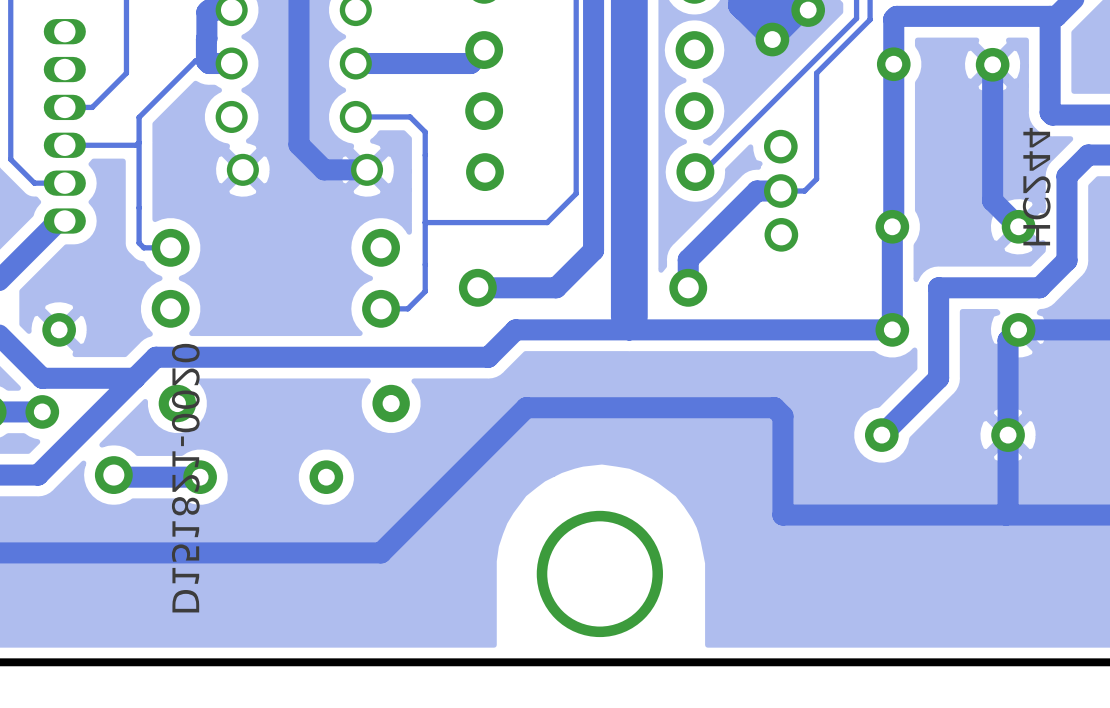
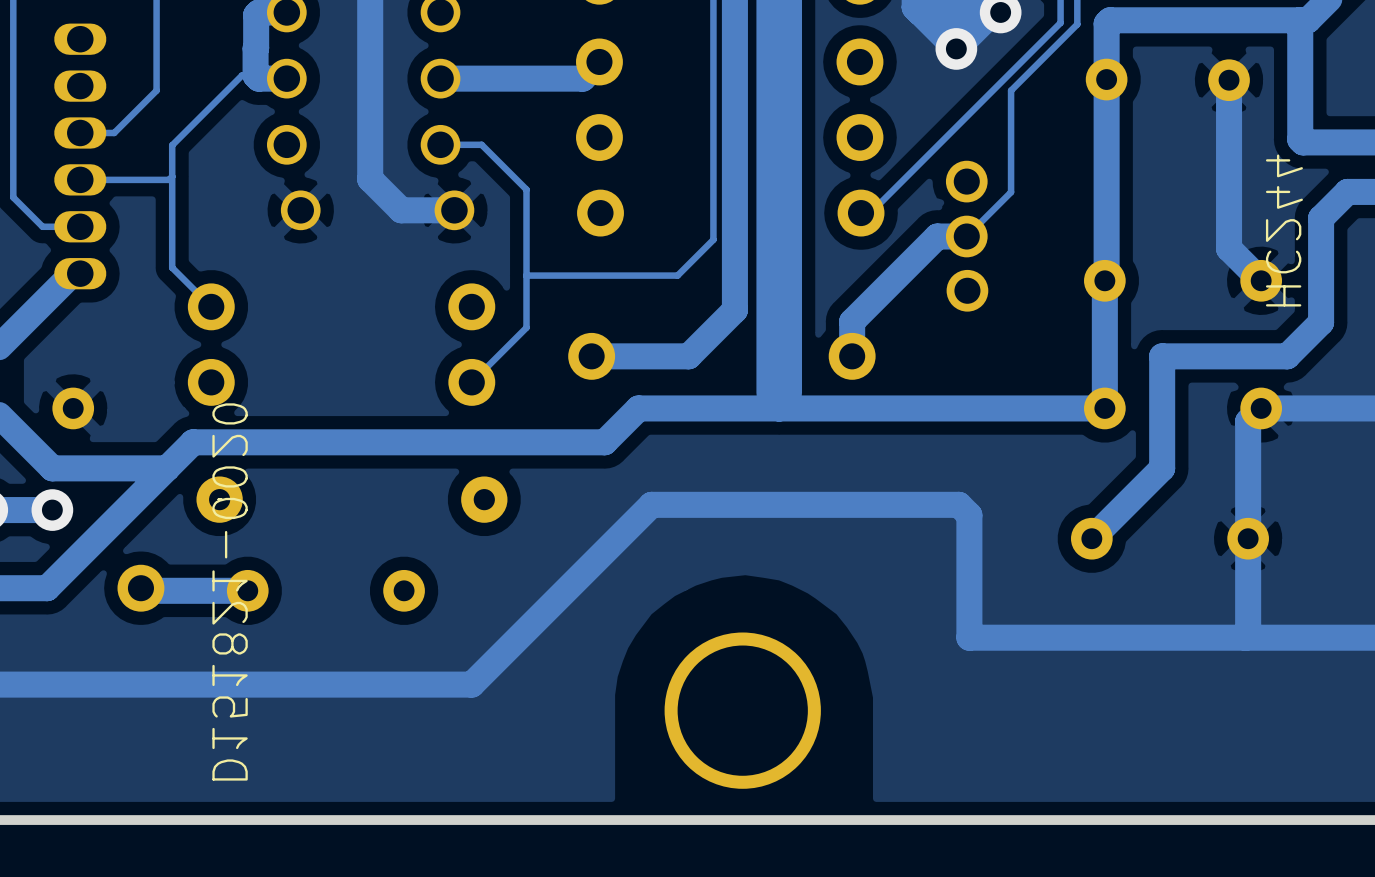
track: (389, 116) (410, 116) (425, 132) (425, 153) -> (481, 144) (526, 189)
track: (816, 155) (816, 179) (804, 191) (780, 191) -> (1011, 192) (966, 236)
track: (139, 216) (139, 243) (143, 247) (170, 247) -> (172, 267) (211, 306)
track: (425, 264) (425, 291) (407, 308) (381, 308) -> (526, 327) (471, 382)

